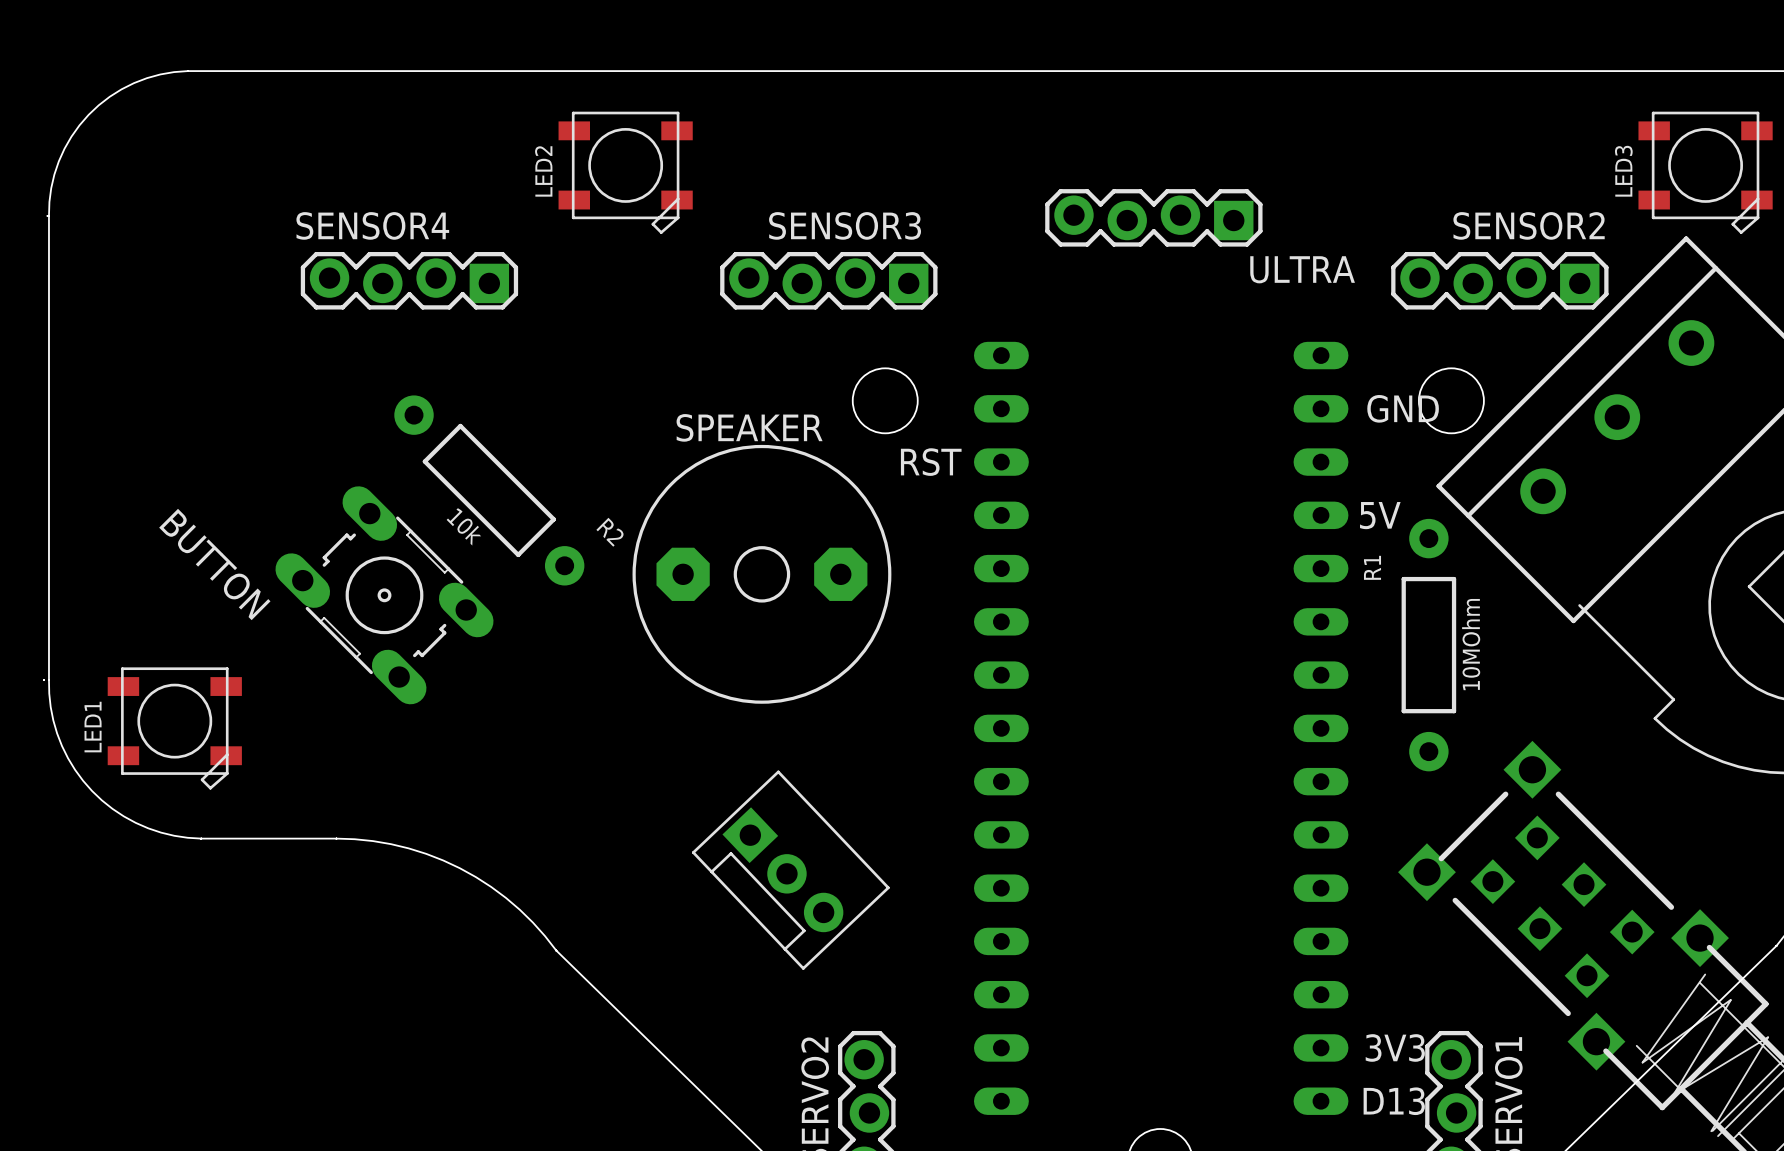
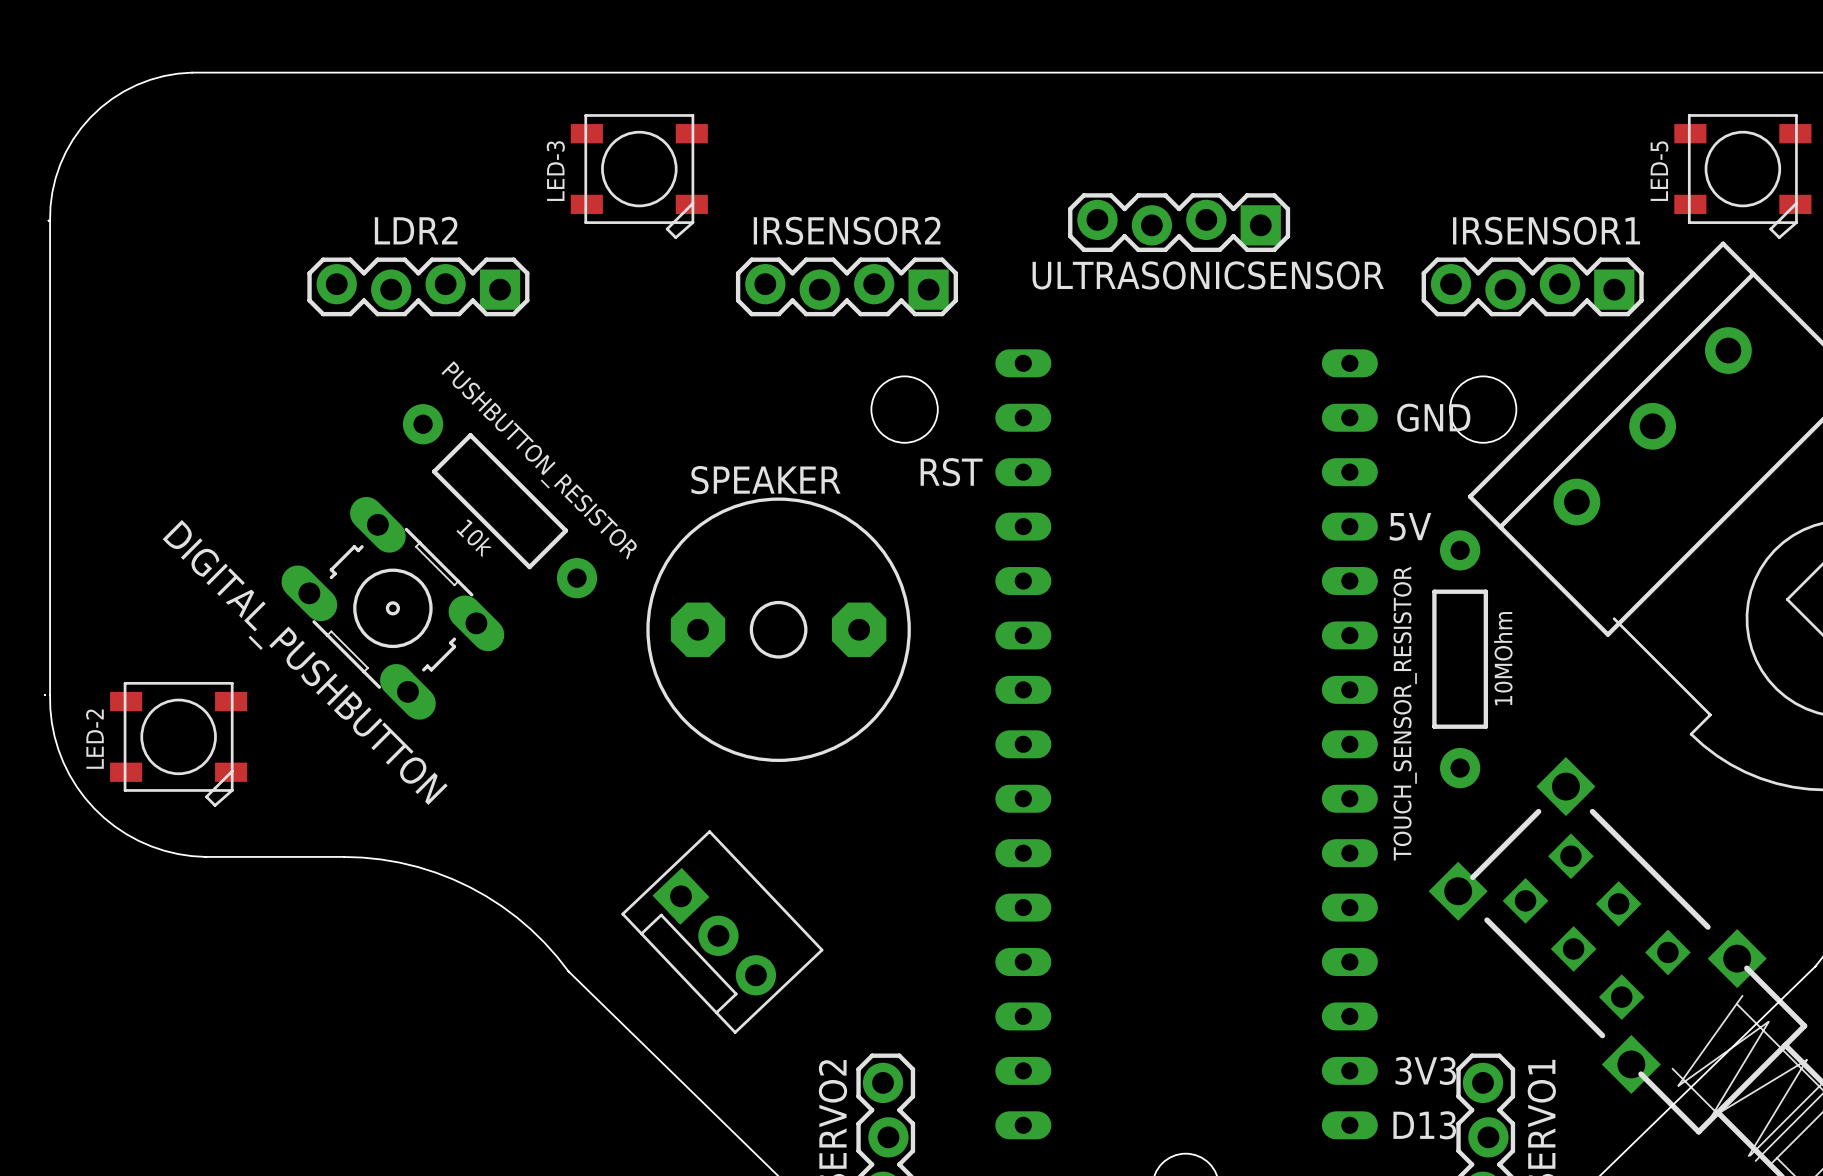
LED2 name: LED2 (543, 171) -> LED-3 (555, 171)
LED3 name: LED3 (1623, 171) -> LED-5 (1659, 171)
SENSOR4 name: SENSOR4 (372, 225) -> LDR2 (416, 230)
SENSOR3 name: SENSOR3 (845, 225) -> IRSENSOR2 (847, 230)
SENSOR2 name: SENSOR2 (1529, 225) -> IRSENSOR1 (1546, 230)
ULTRA name: ULTRA (1302, 269) -> ULTRASONICSENSOR (1208, 275)
R2 name: R2 (609, 532) -> PUSHBUTTON_RESISTOR (539, 460)
BUTTON name: BUTTON (214, 564) -> DIGITAL_PUSHBUTTON (305, 662)
R1 name: R1 (1372, 567) -> TOUCH_SENSOR_RESISTOR (1405, 713)
SPEAKER position: (761, 574) -> (778, 629)
LED1 name: LED1 (93, 727) -> LED-2 (94, 739)
part position: (790, 870) -> (722, 932)

